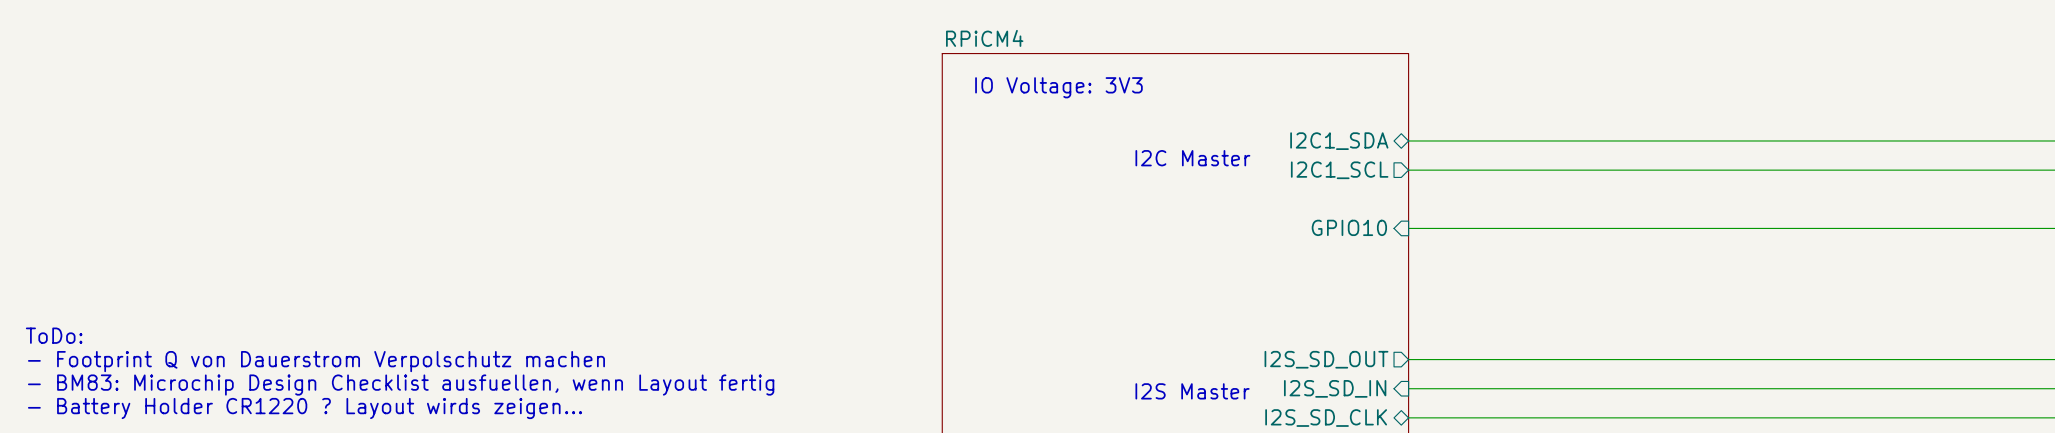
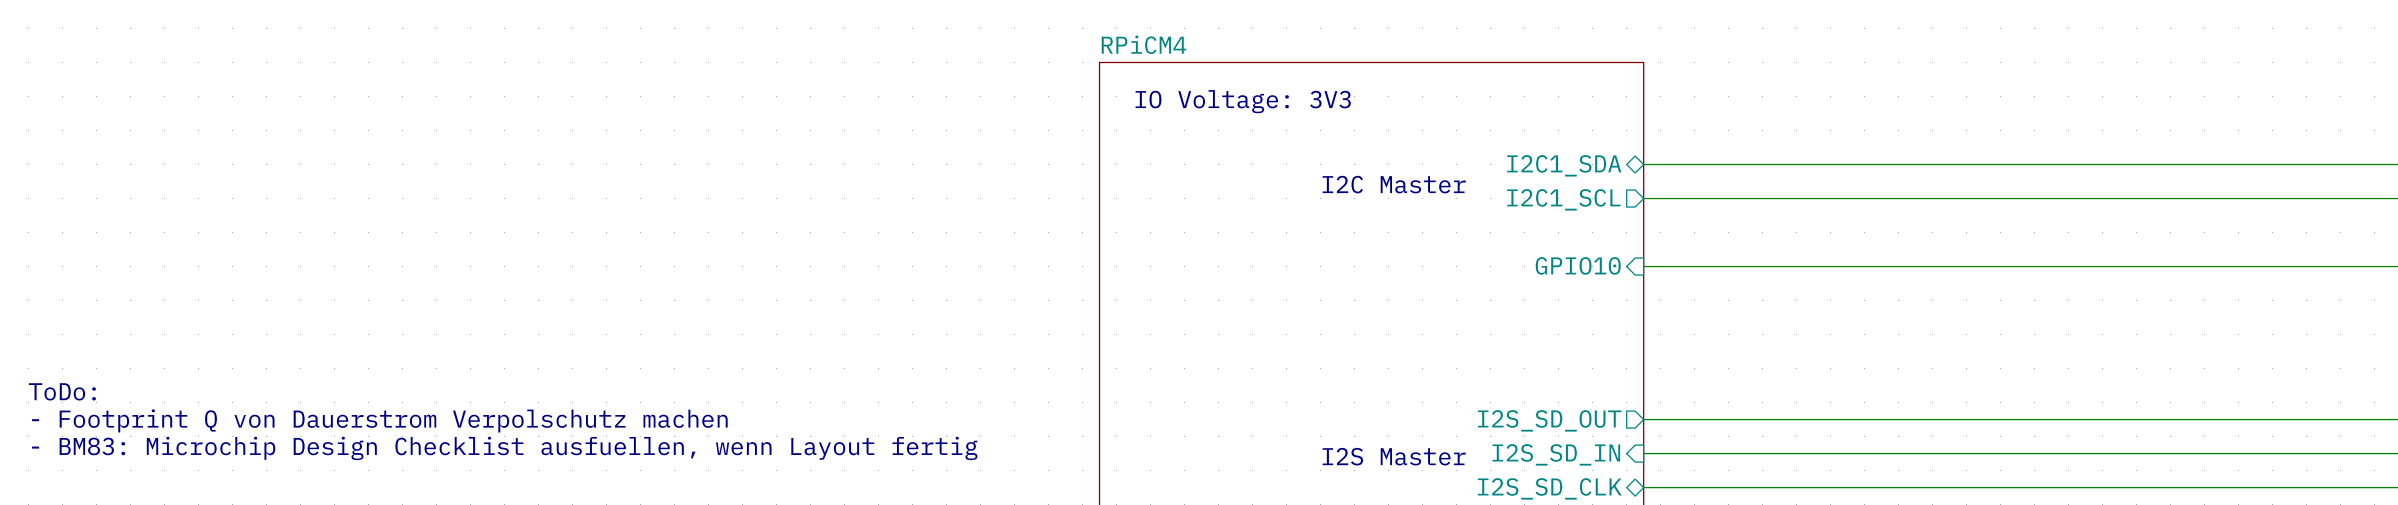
text: - Battery Holder CR1220 ? Layout wirds zeigen… (305, 408) -> none

